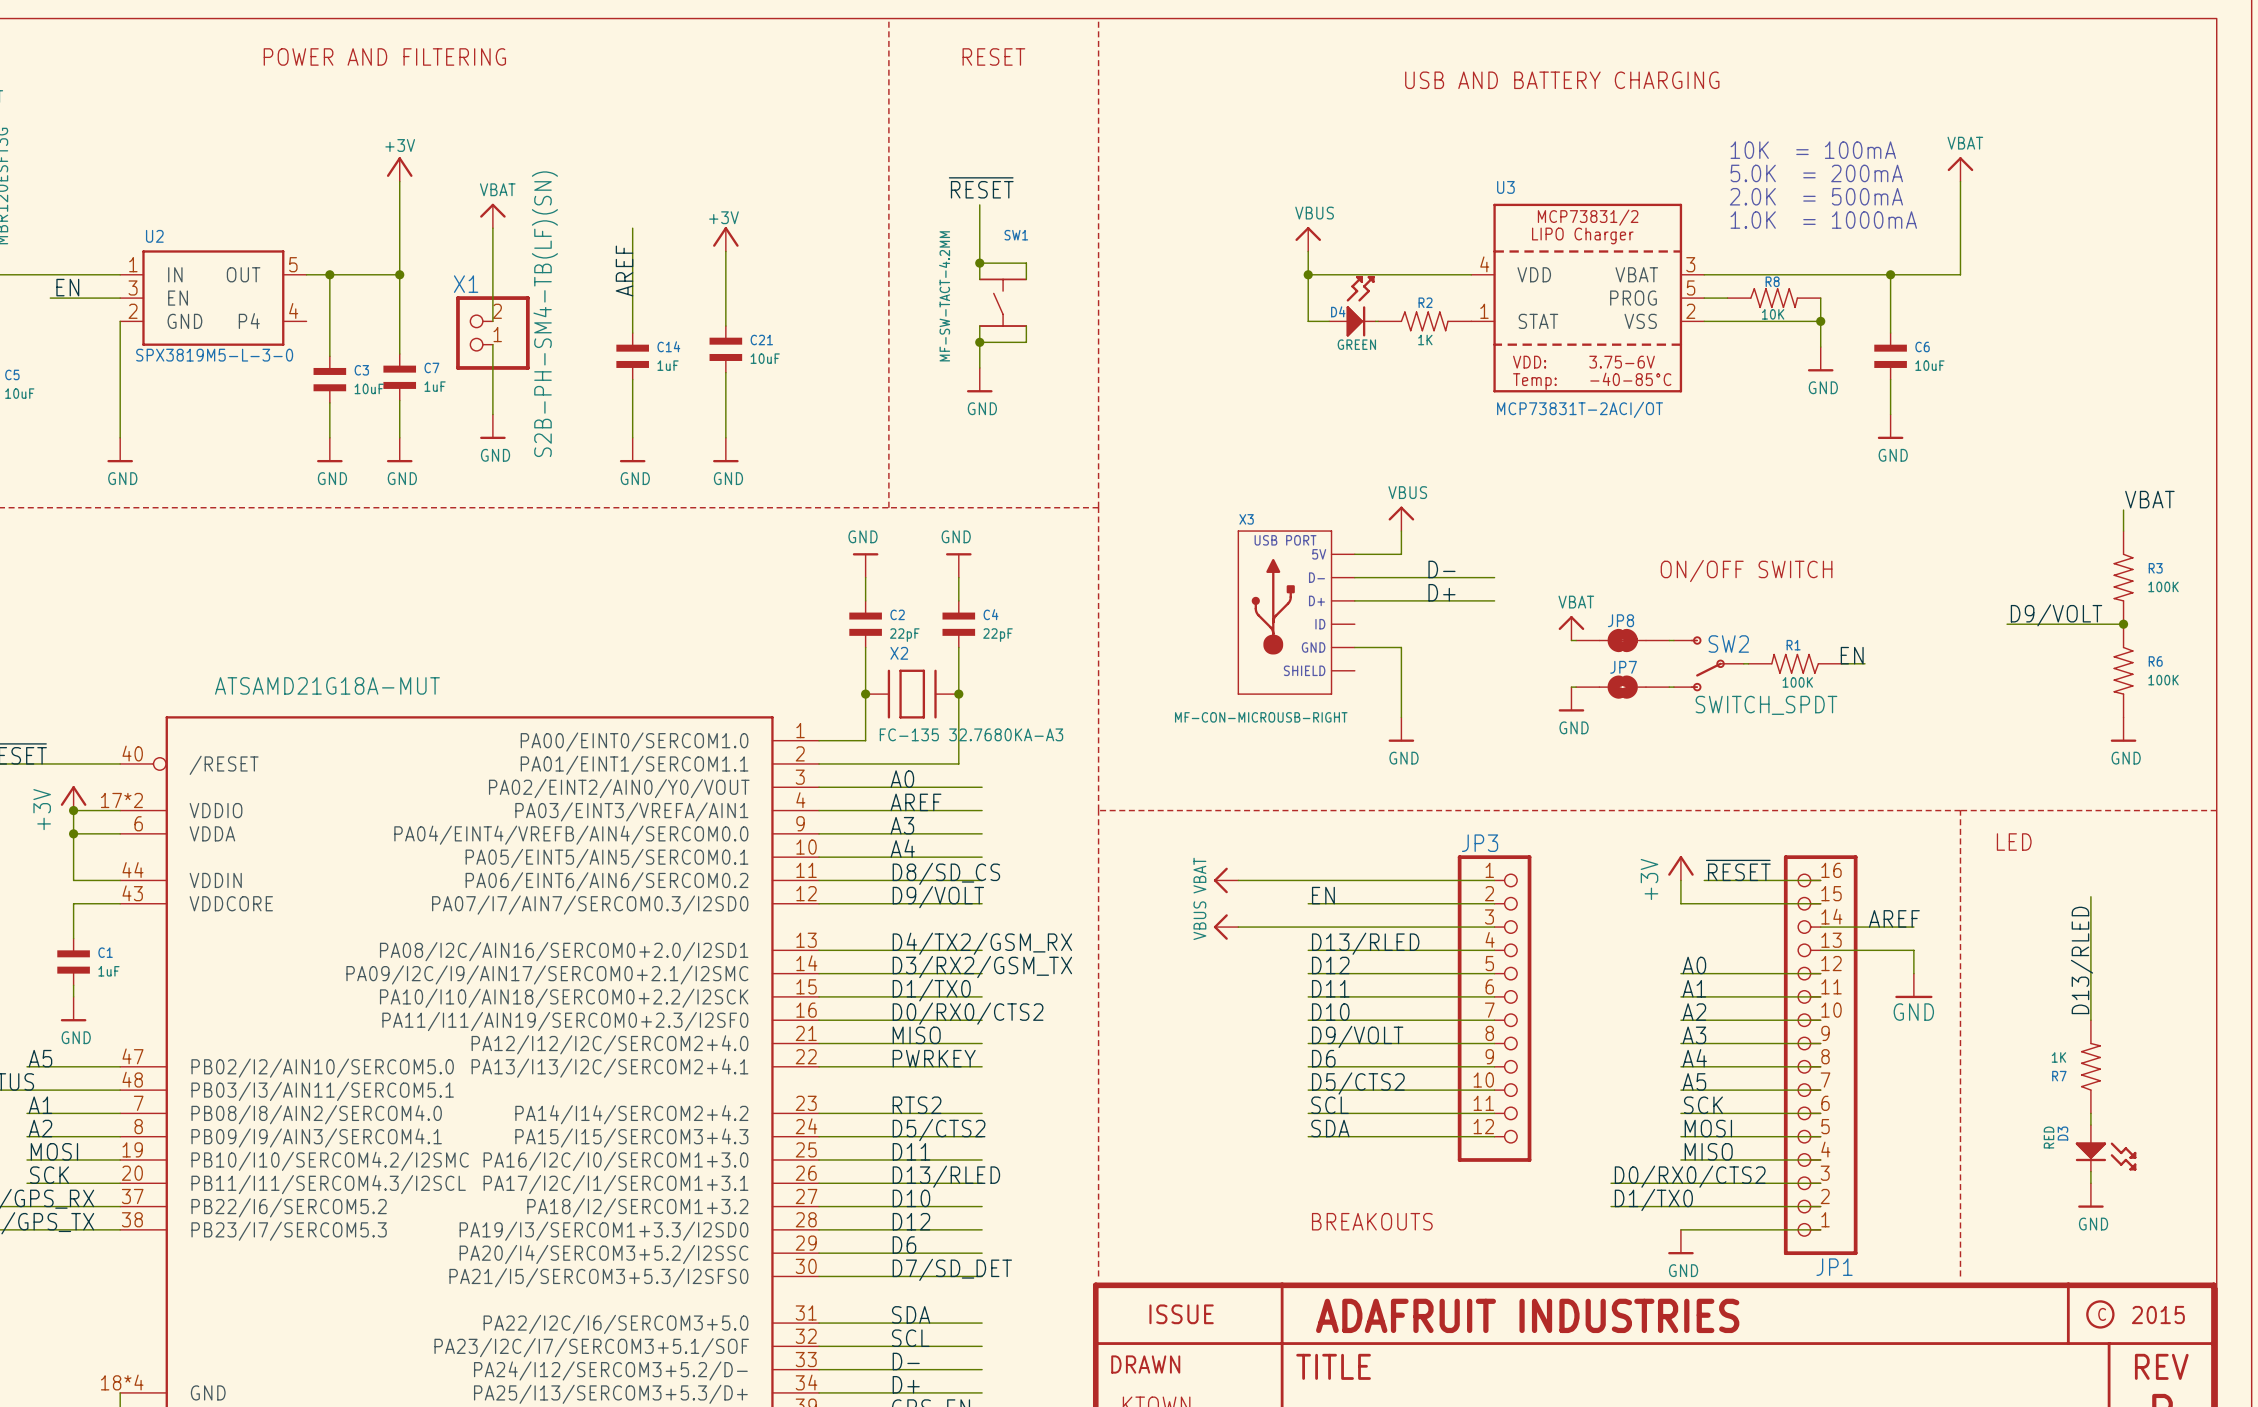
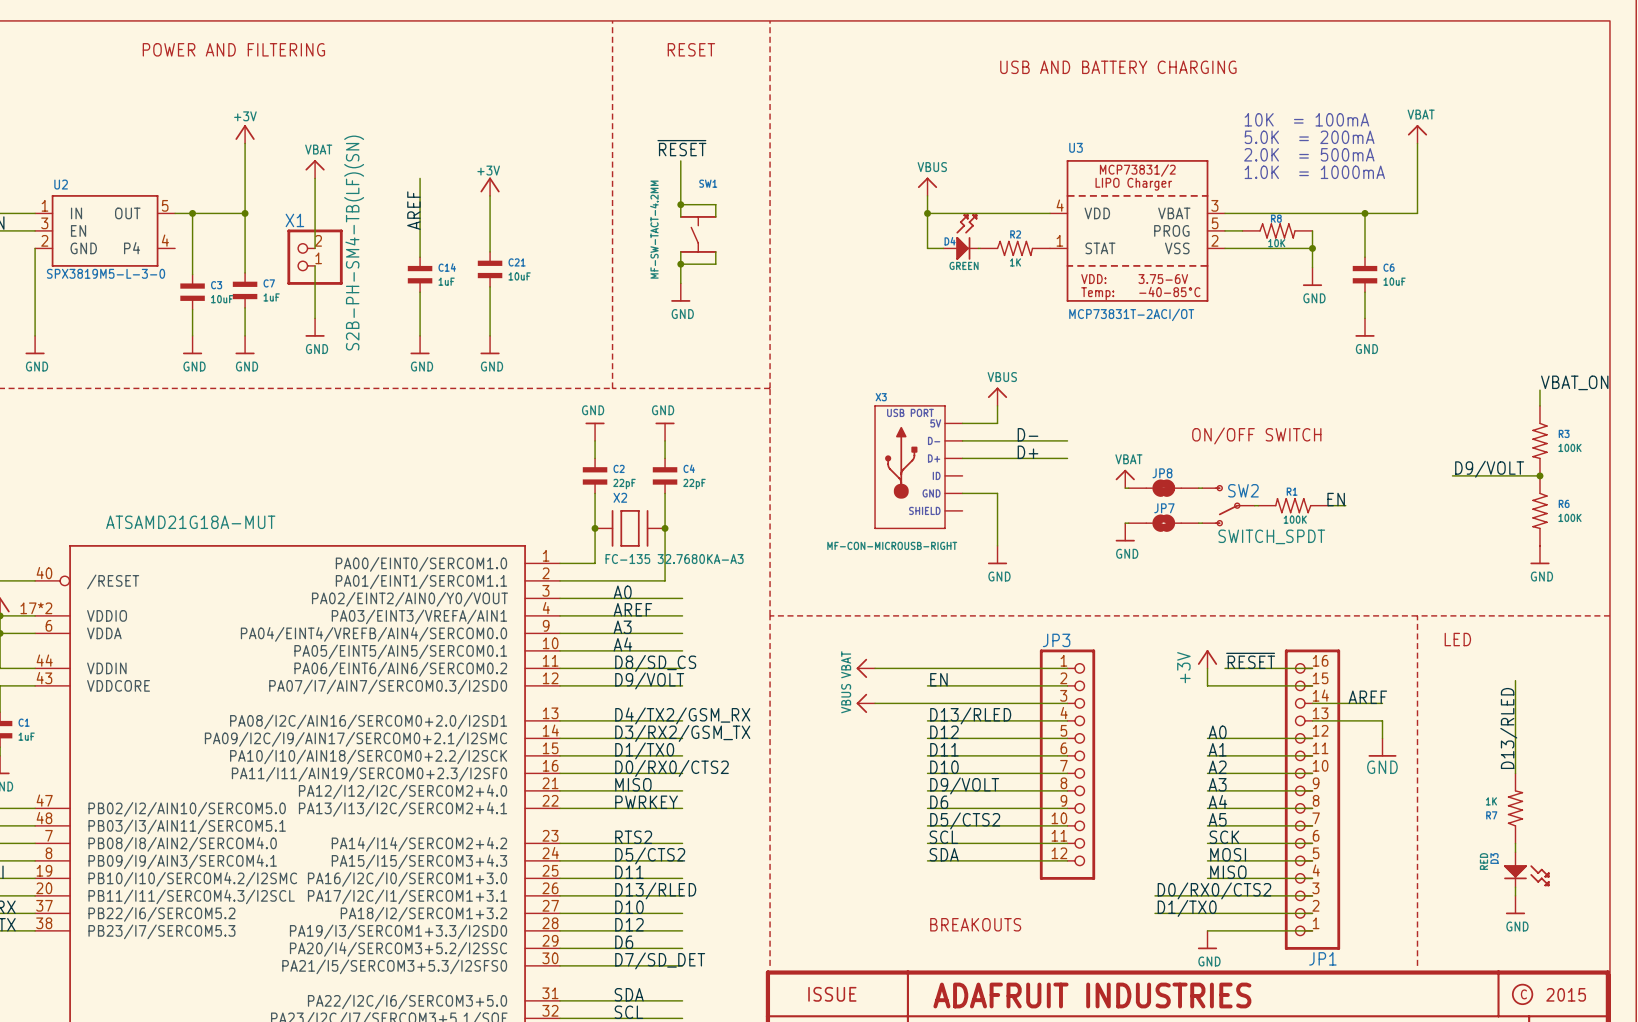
label: VBAT (2149, 499) -> VBAT_ON (1574, 382)

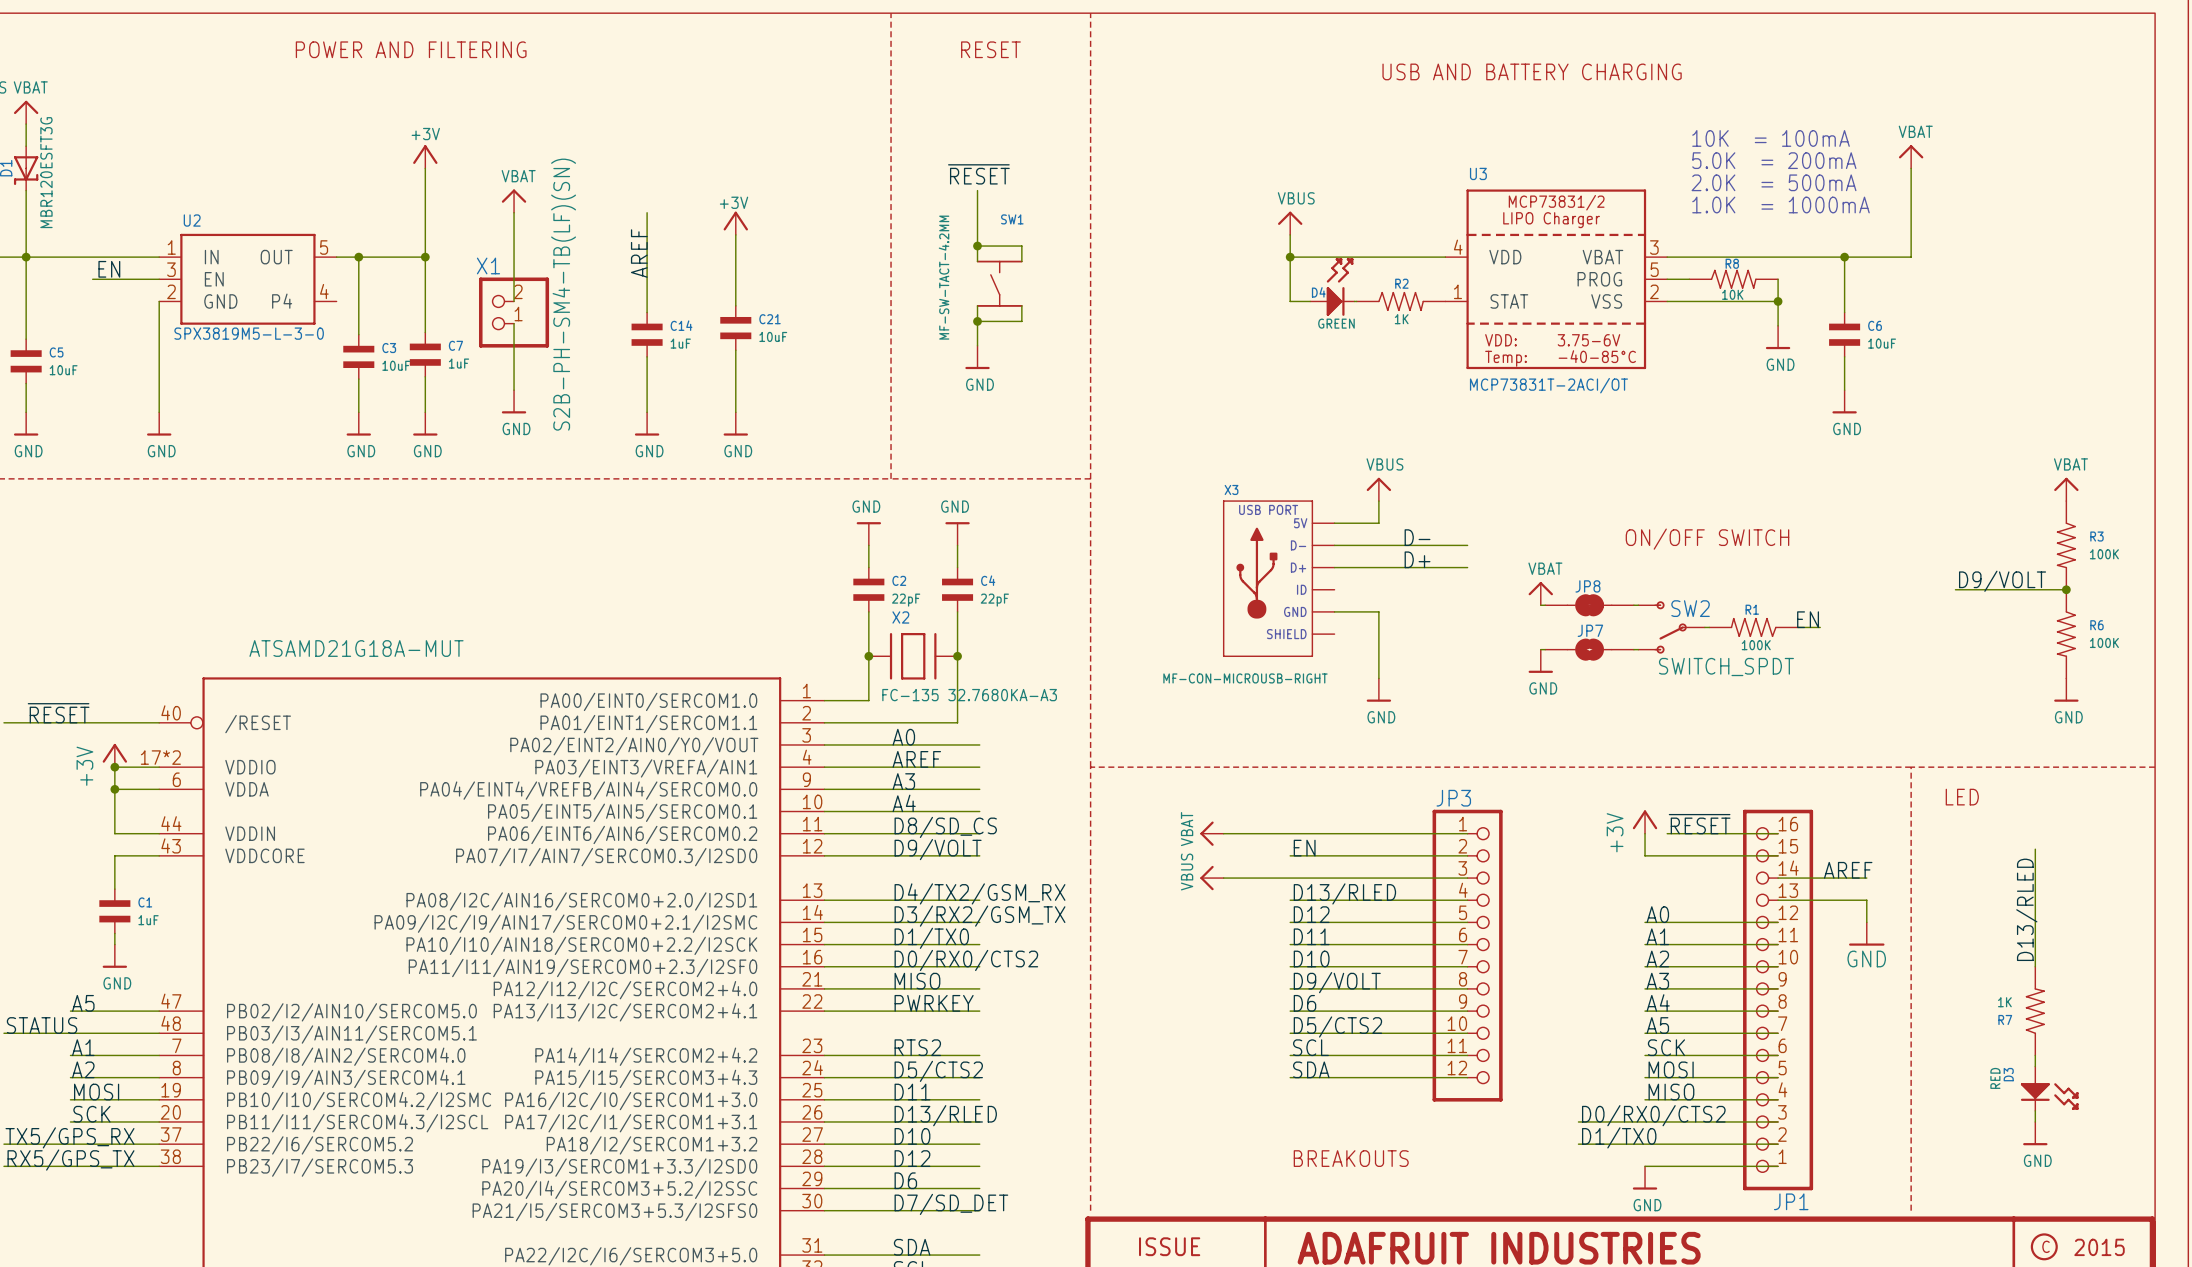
label: VBAT_ON (1574, 382) -> none
power symbol: none -> VBAT (2066, 489)

